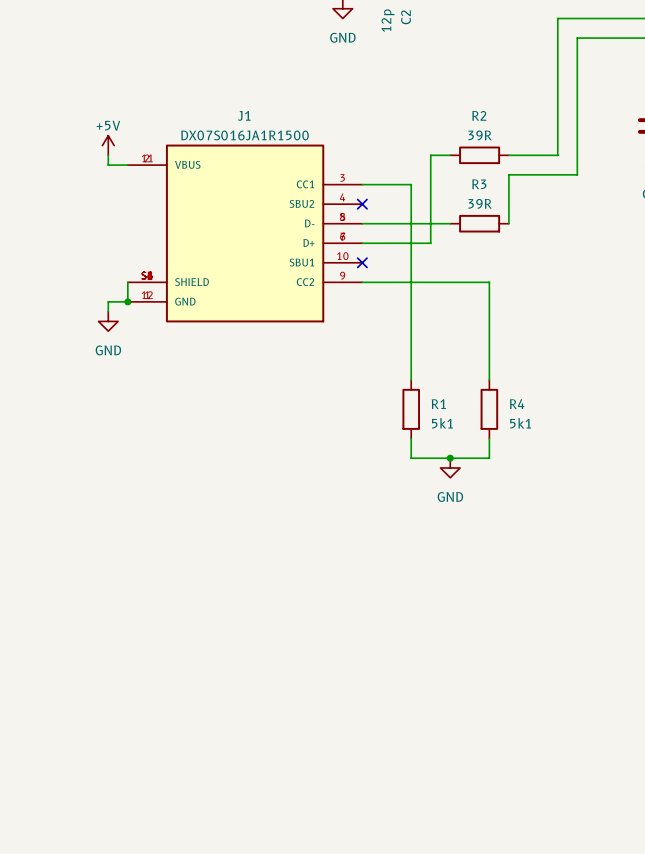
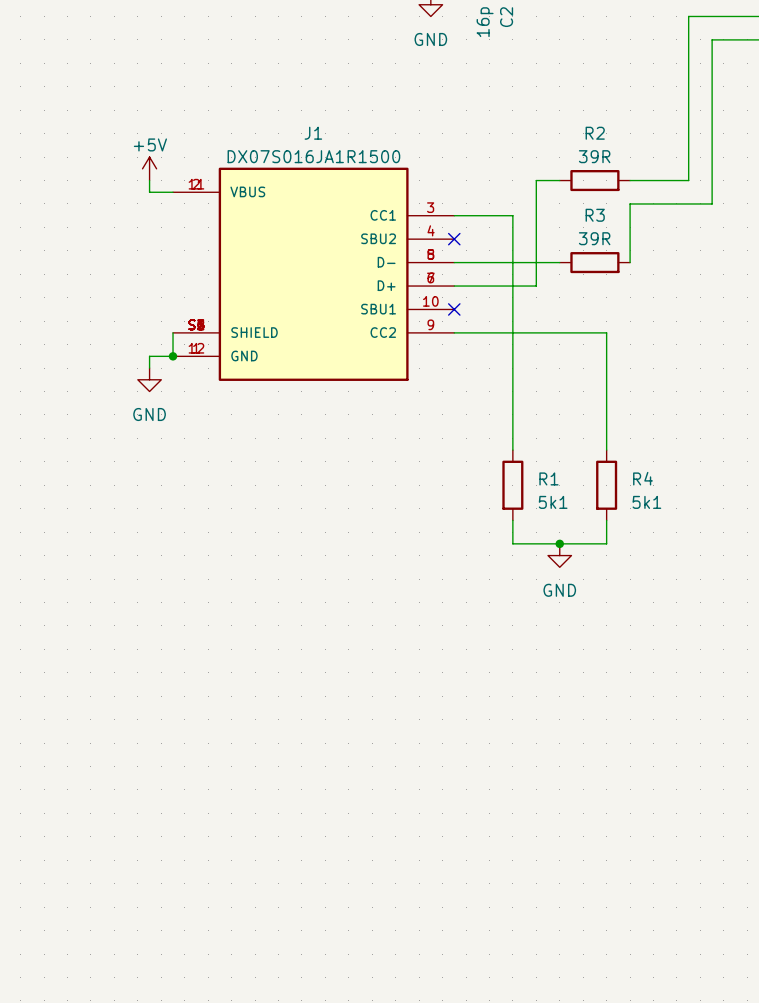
C2 value: 12p (388, 20) -> 16p (485, 22)

